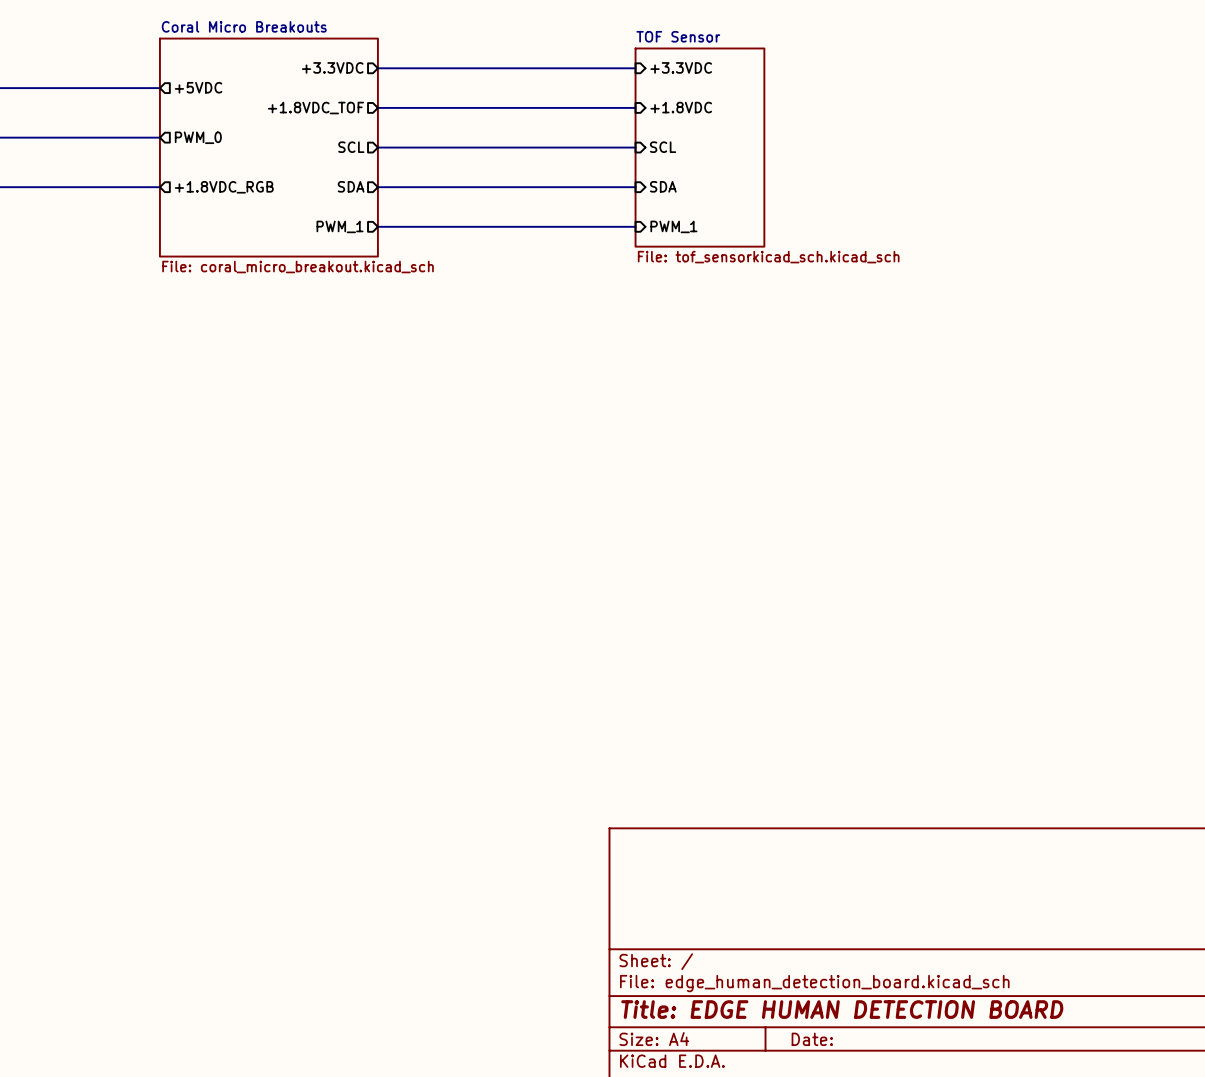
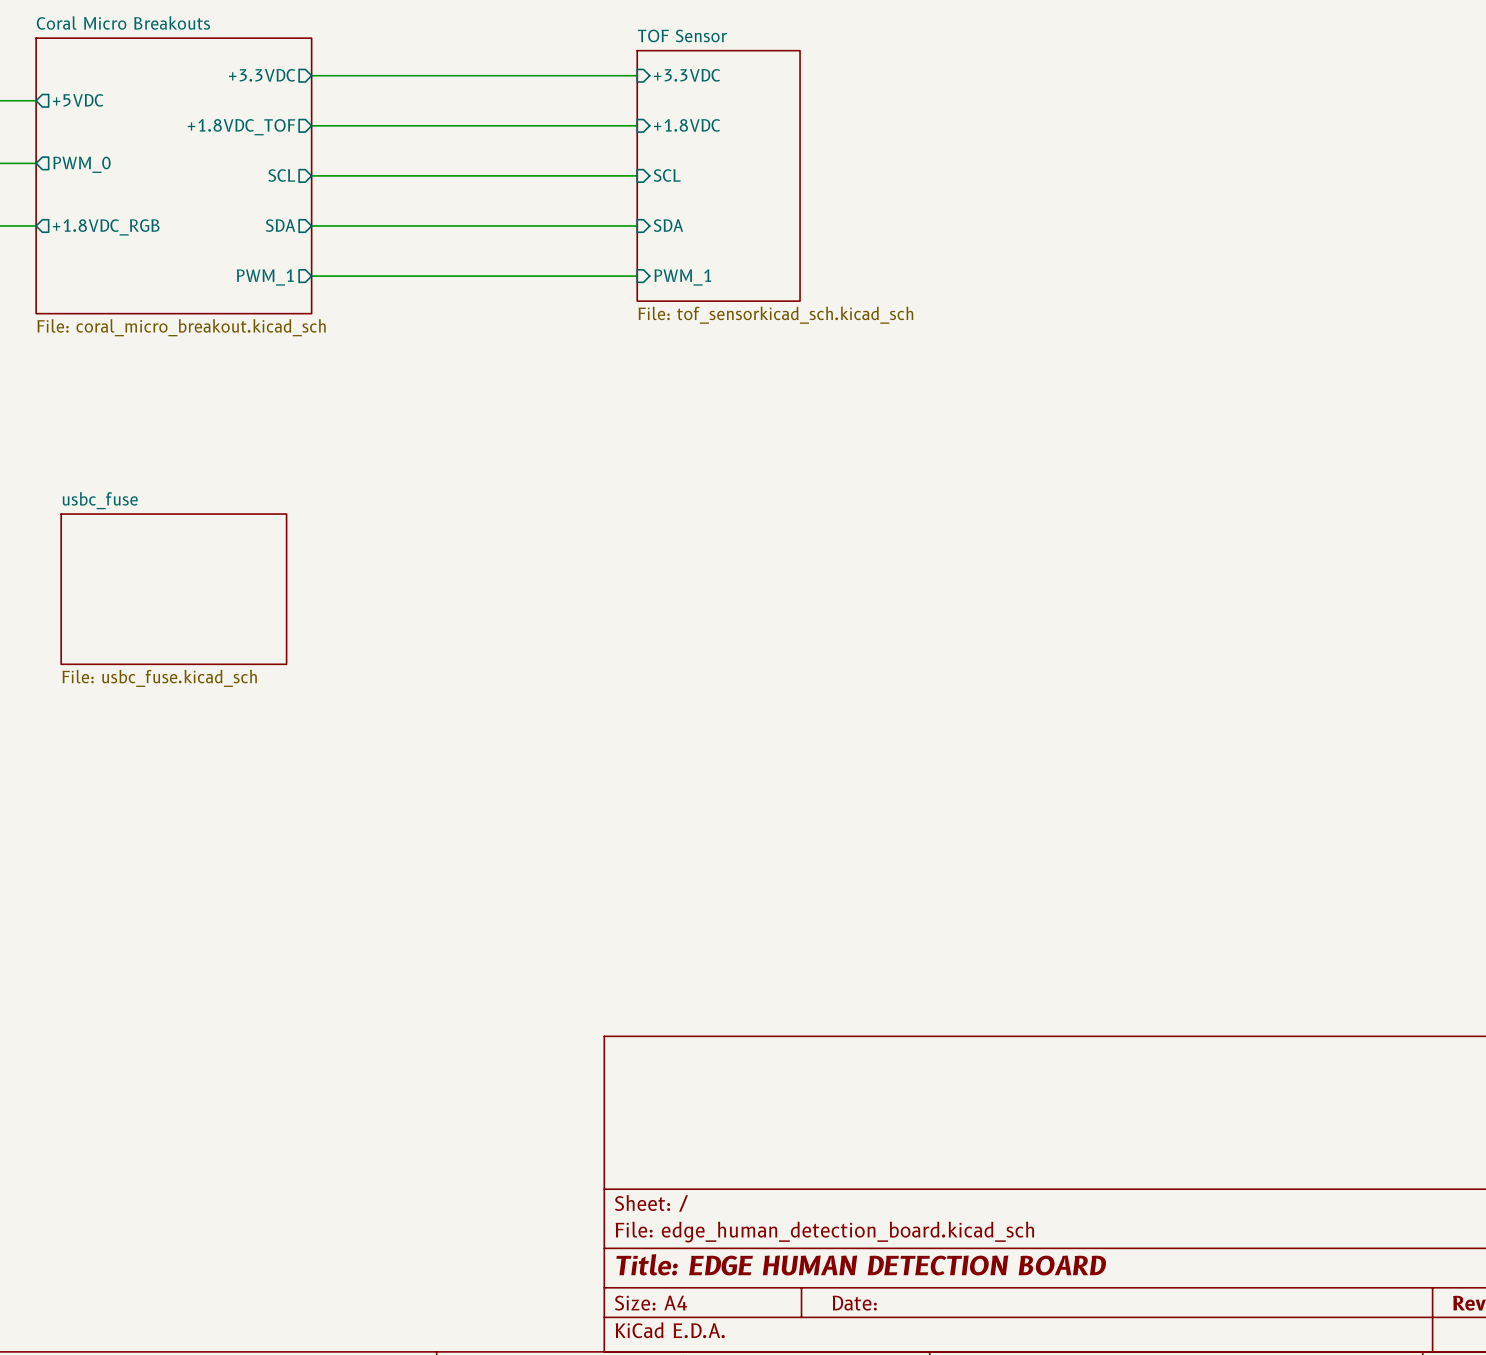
sheet usbc_fuse: none -> File: usbc_fuse.kicad_sch (173, 589)

